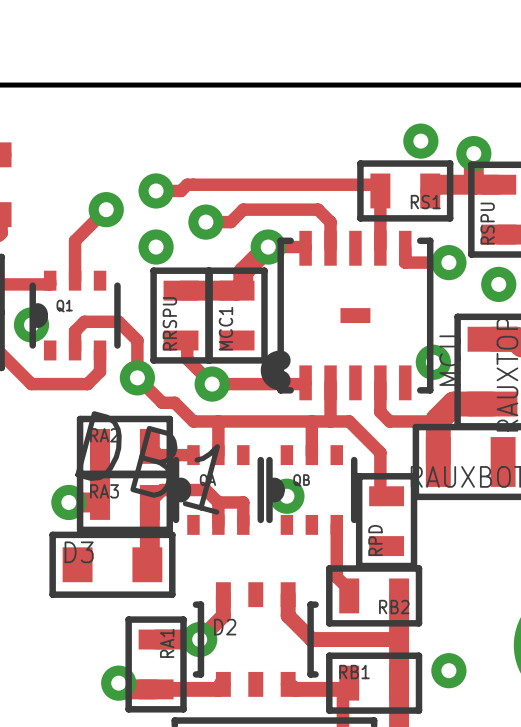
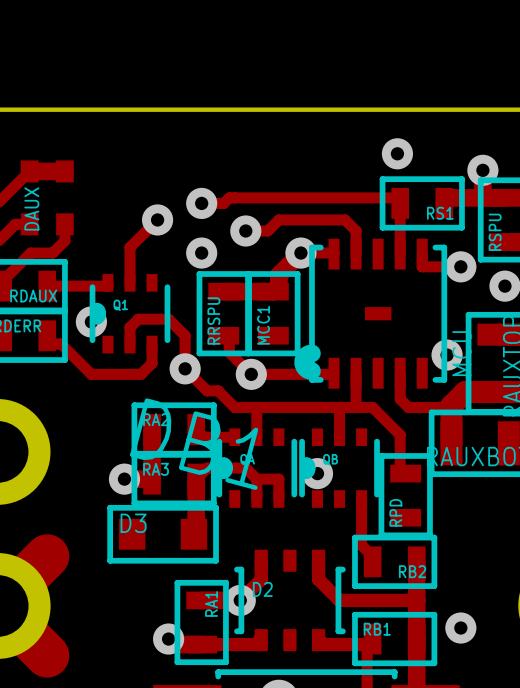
via position: (420, 141) -> (397, 153)

